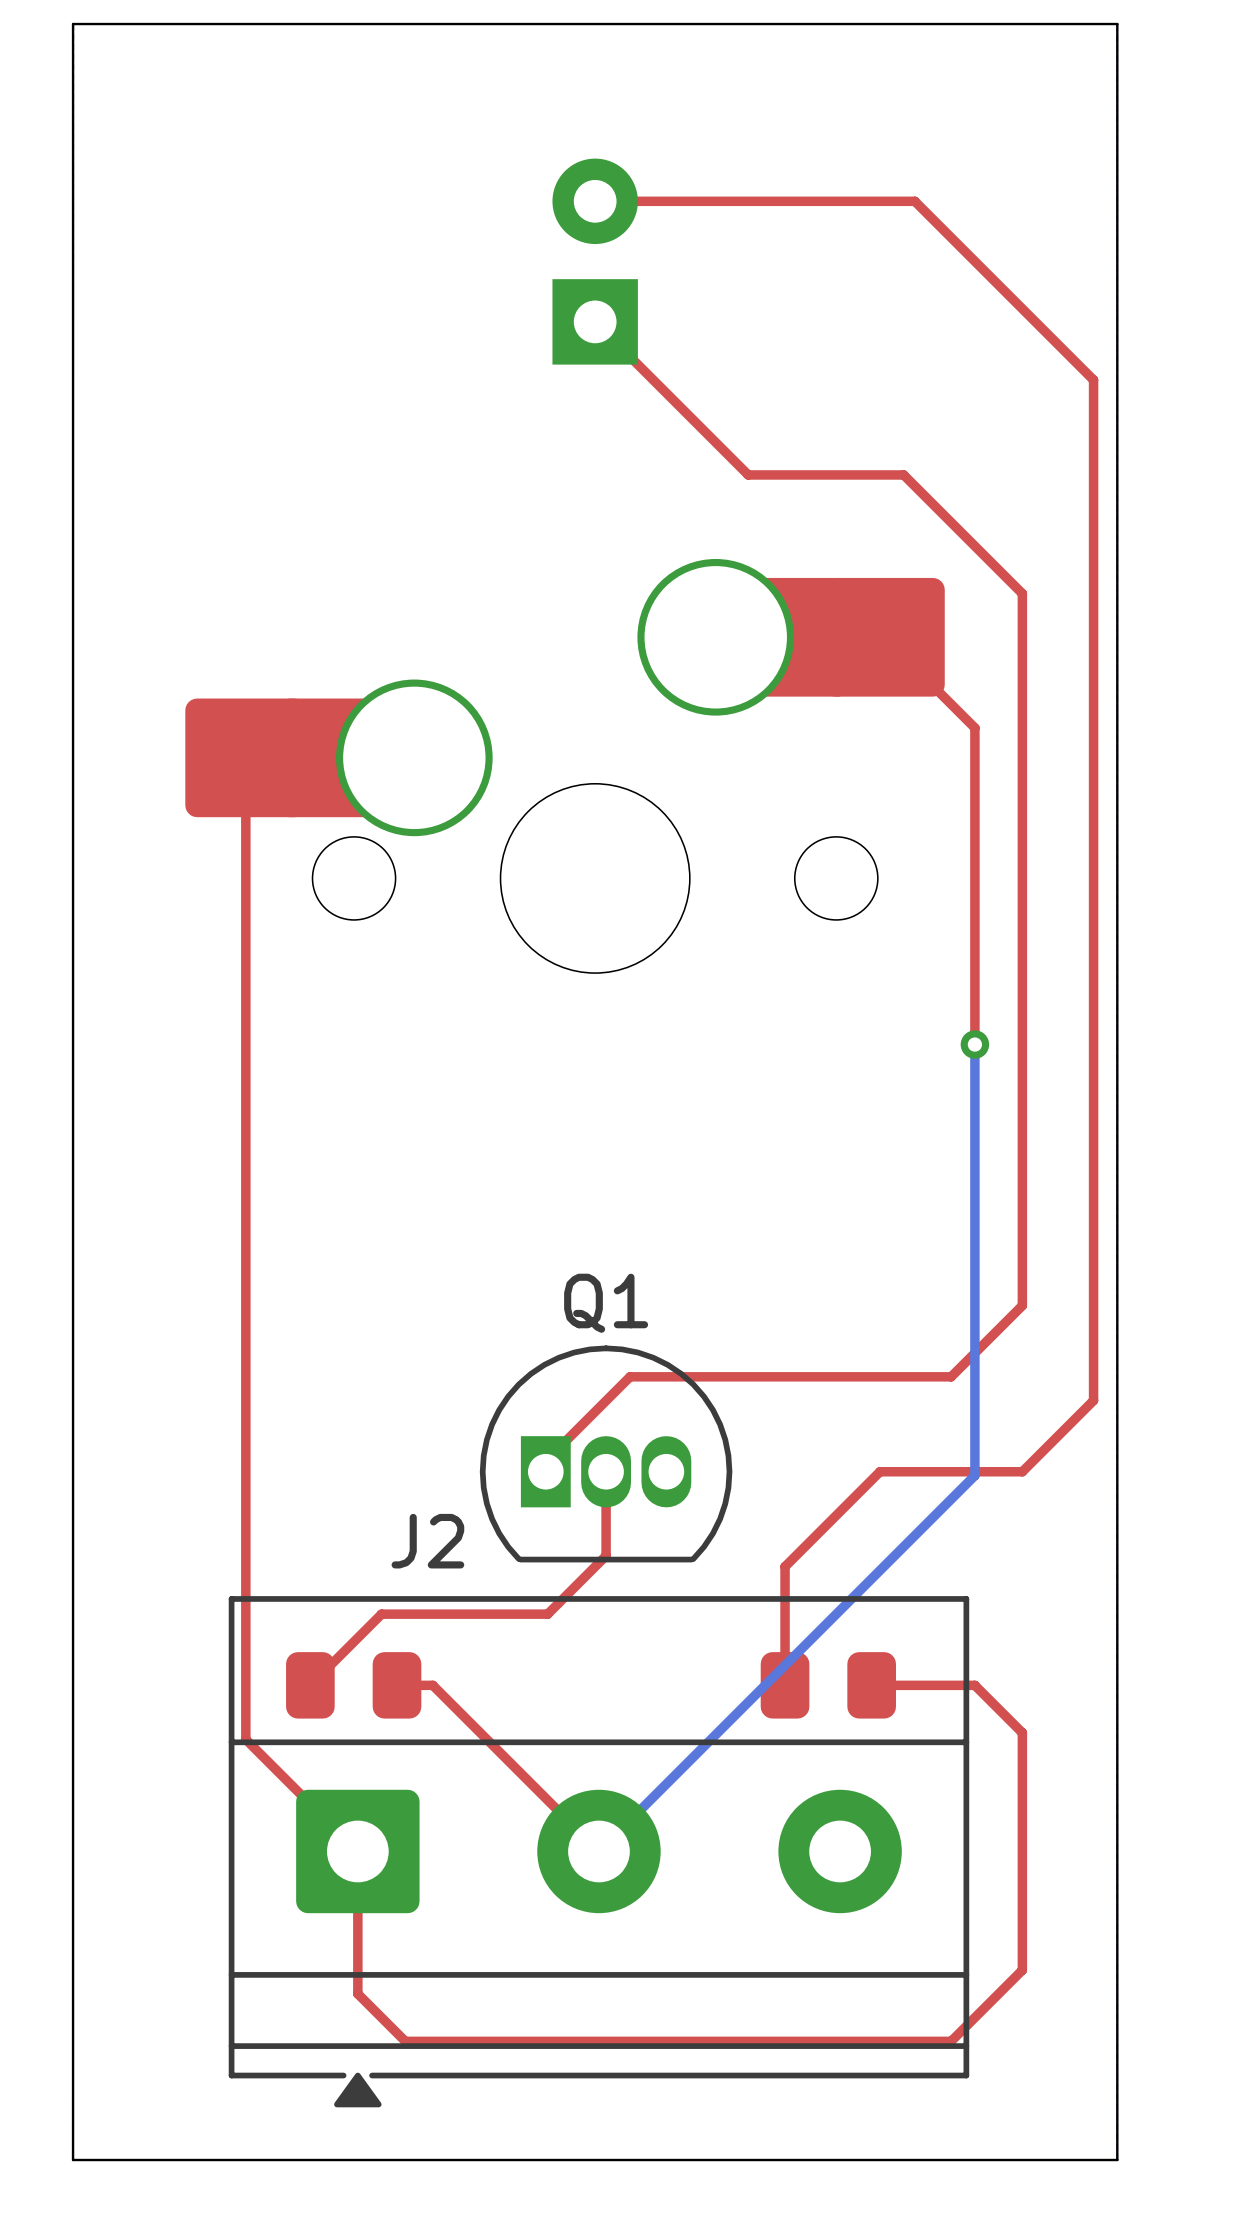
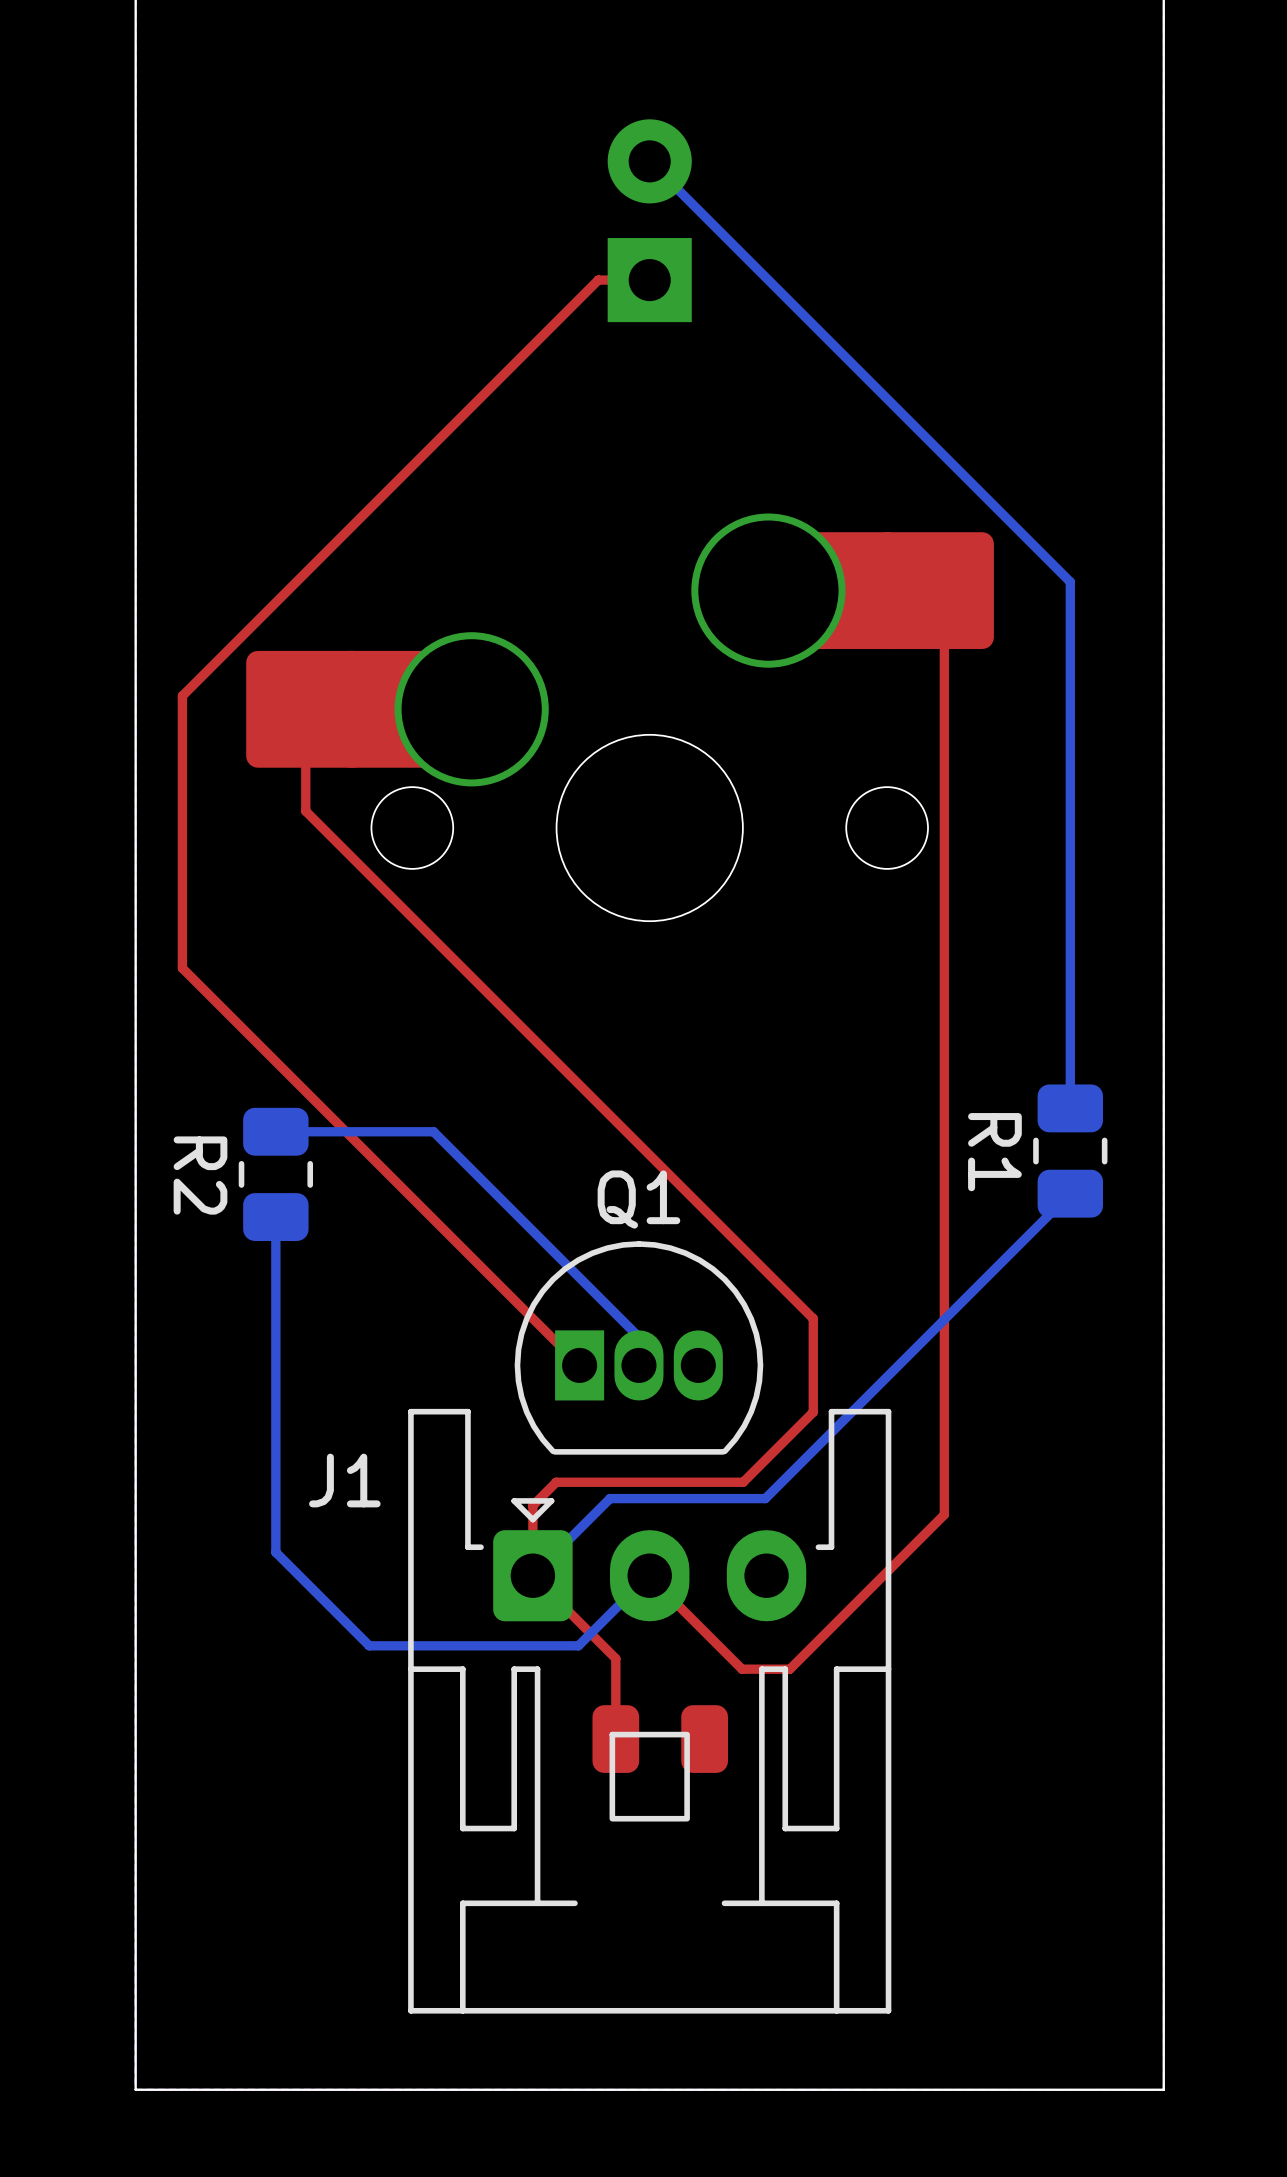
top track: (595, 201) (914, 201) (1093, 380) (1093, 1400) (1022, 1471) (879, 1471) (785, 1566) (785, 1685) -> none
bottom track: none -> (649, 161) (1070, 581) (1070, 1108)
top track: (595, 321) (748, 474) (903, 474) (1022, 593) (1022, 1305) (951, 1376) (630, 1376) (545, 1461) (545, 1471) -> (649, 280) (598, 280) (182, 695) (182, 968) (579, 1365)
top track: (894, 647) (974, 727) (974, 1044) -> (944, 600) (944, 1514) (789, 1669) (742, 1669) (649, 1575)
top track: (245, 861) (245, 1739) (357, 1851) (357, 1993) (405, 2041) (951, 2041) (1022, 1970) (1022, 1732) (974, 1685) (871, 1685) -> (305, 811) (813, 1318) (813, 1412) (743, 1482) (556, 1482) (532, 1505) (532, 1575) (615, 1658) (615, 1739)
bottom track: (974, 1044) (974, 1475) (598, 1851) -> none
via: (974, 1044) -> none
bottom track: none -> (275, 1131) (433, 1131) (638, 1337) (638, 1365)
bottom track: none -> (1070, 1193) (765, 1498) (610, 1498) (532, 1575)
bottom track: none -> (275, 1217) (275, 1552) (369, 1645) (578, 1645) (648, 1575)
Q1 position: (606, 1453) -> (638, 1347)
top track: (606, 1471) (606, 1555) (547, 1614) (381, 1614) (310, 1685) -> none
R2 side: top (353, 1685) -> bottom (275, 1174)
top track: (397, 1685) (432, 1685) (598, 1851) -> none
R1 side: top (828, 1685) -> bottom (1070, 1151)
J1: none -> (649, 1711)
part: none -> (660, 1739)
J2: (598, 1851) -> none

